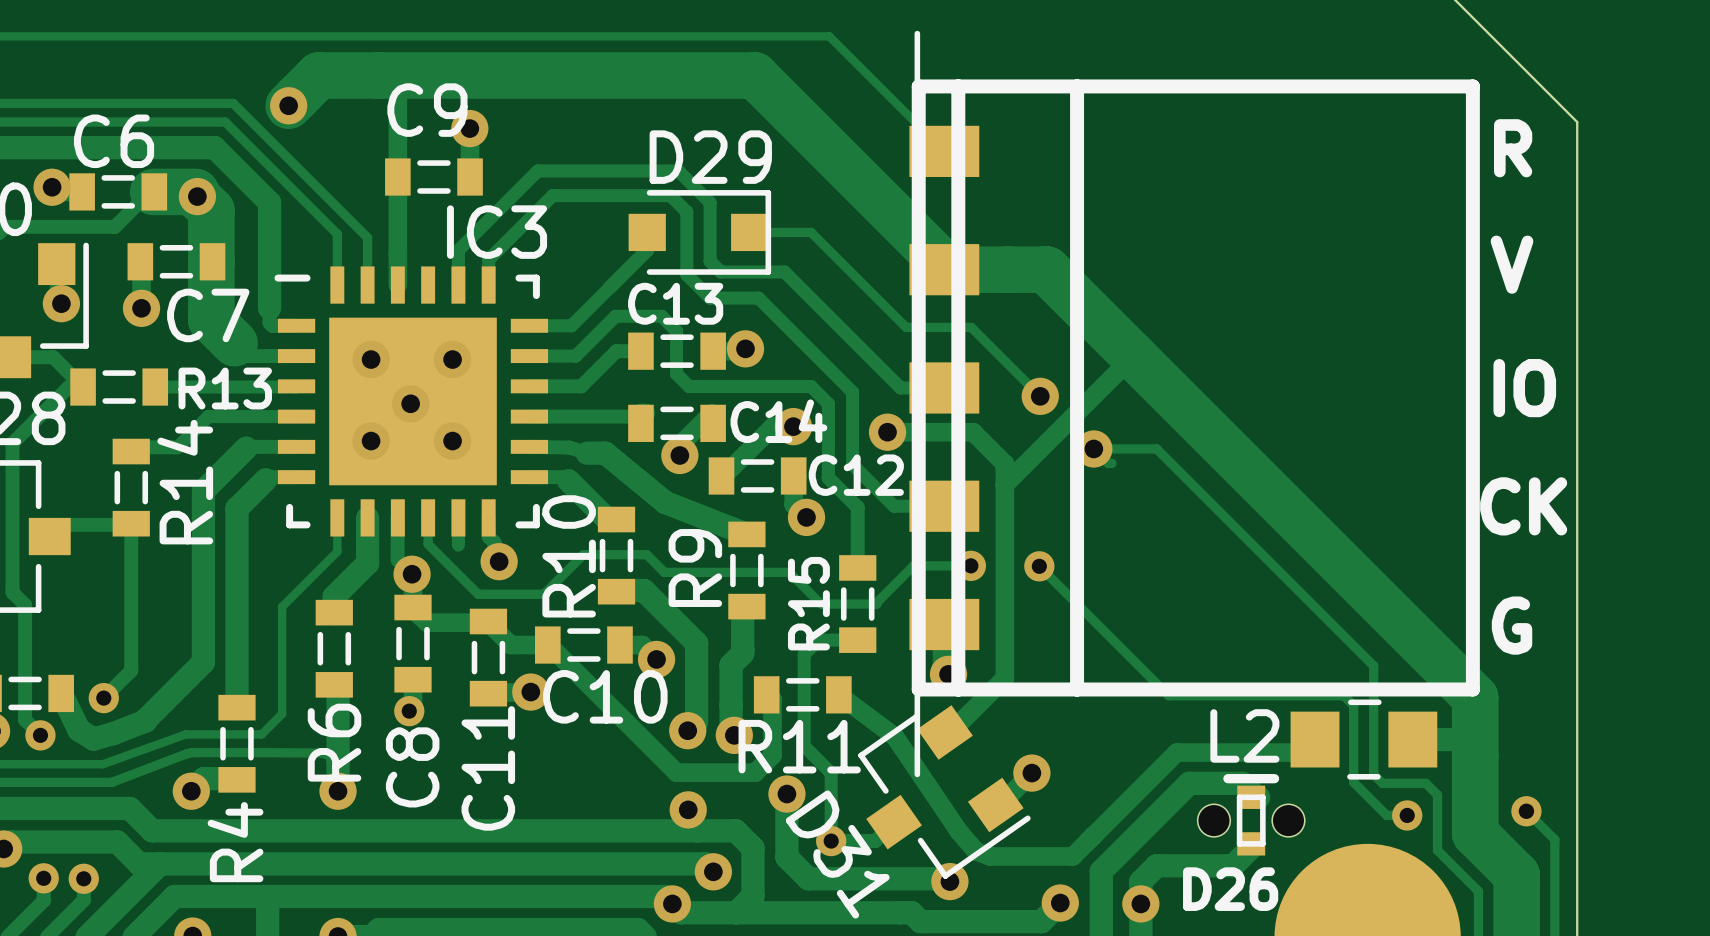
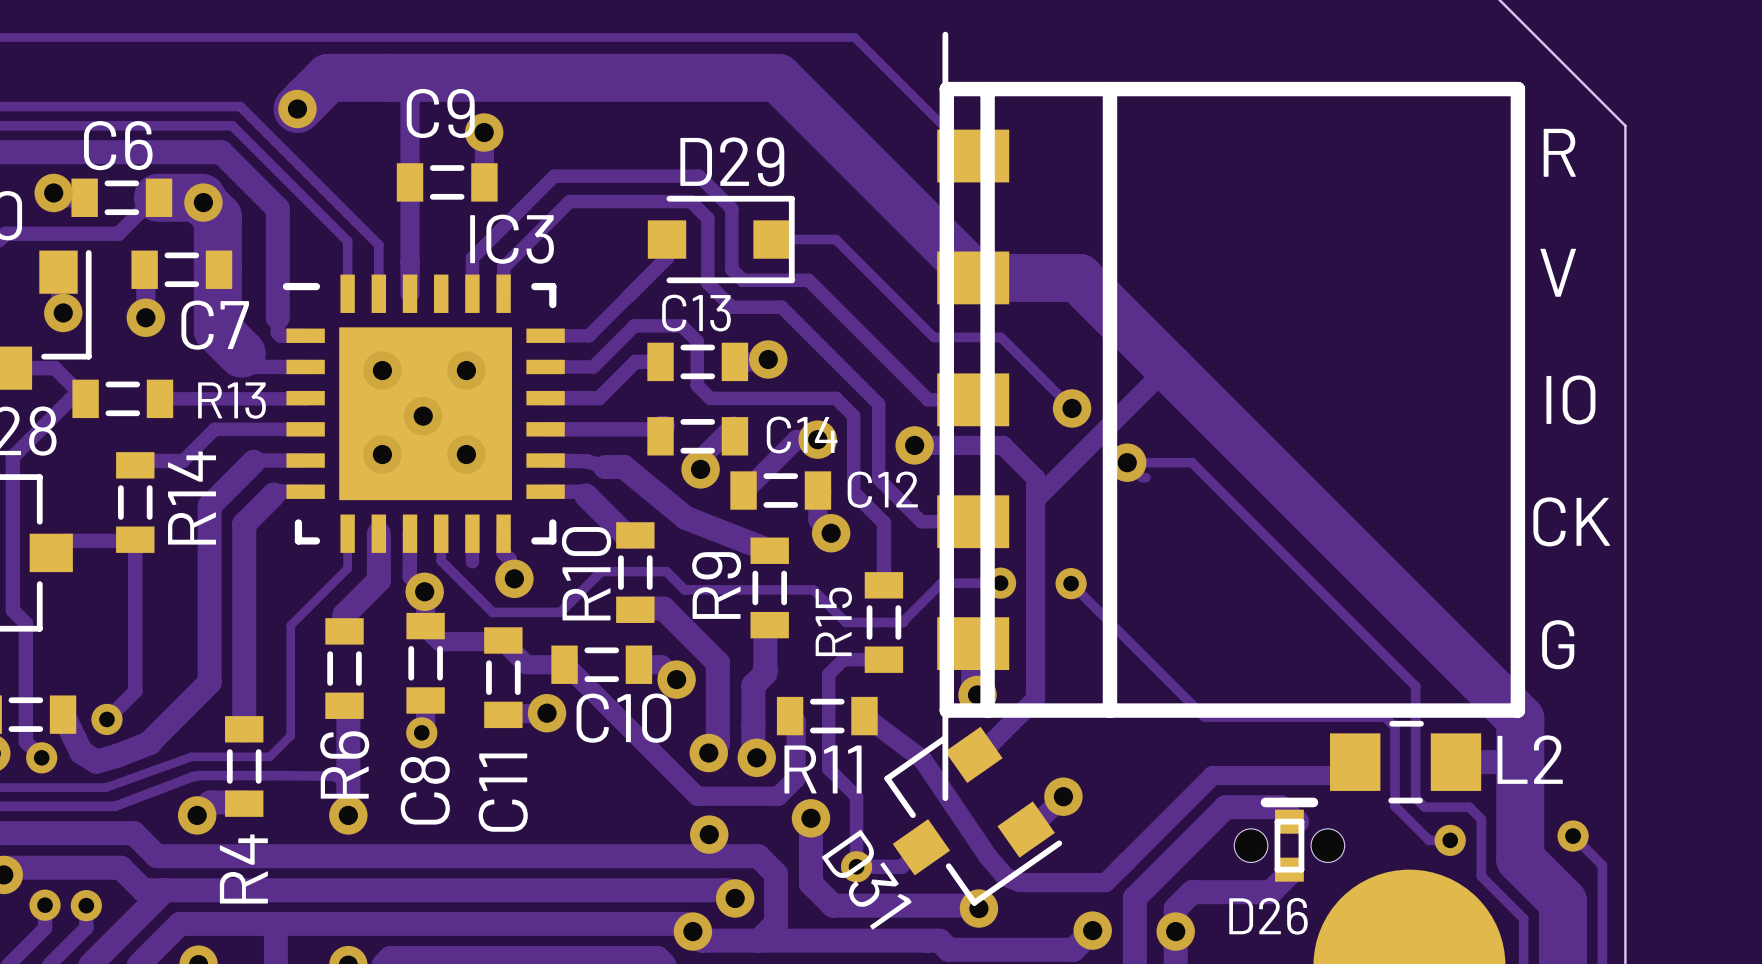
L2 name position: L2 (1244, 735) -> L2 (1530, 759)

